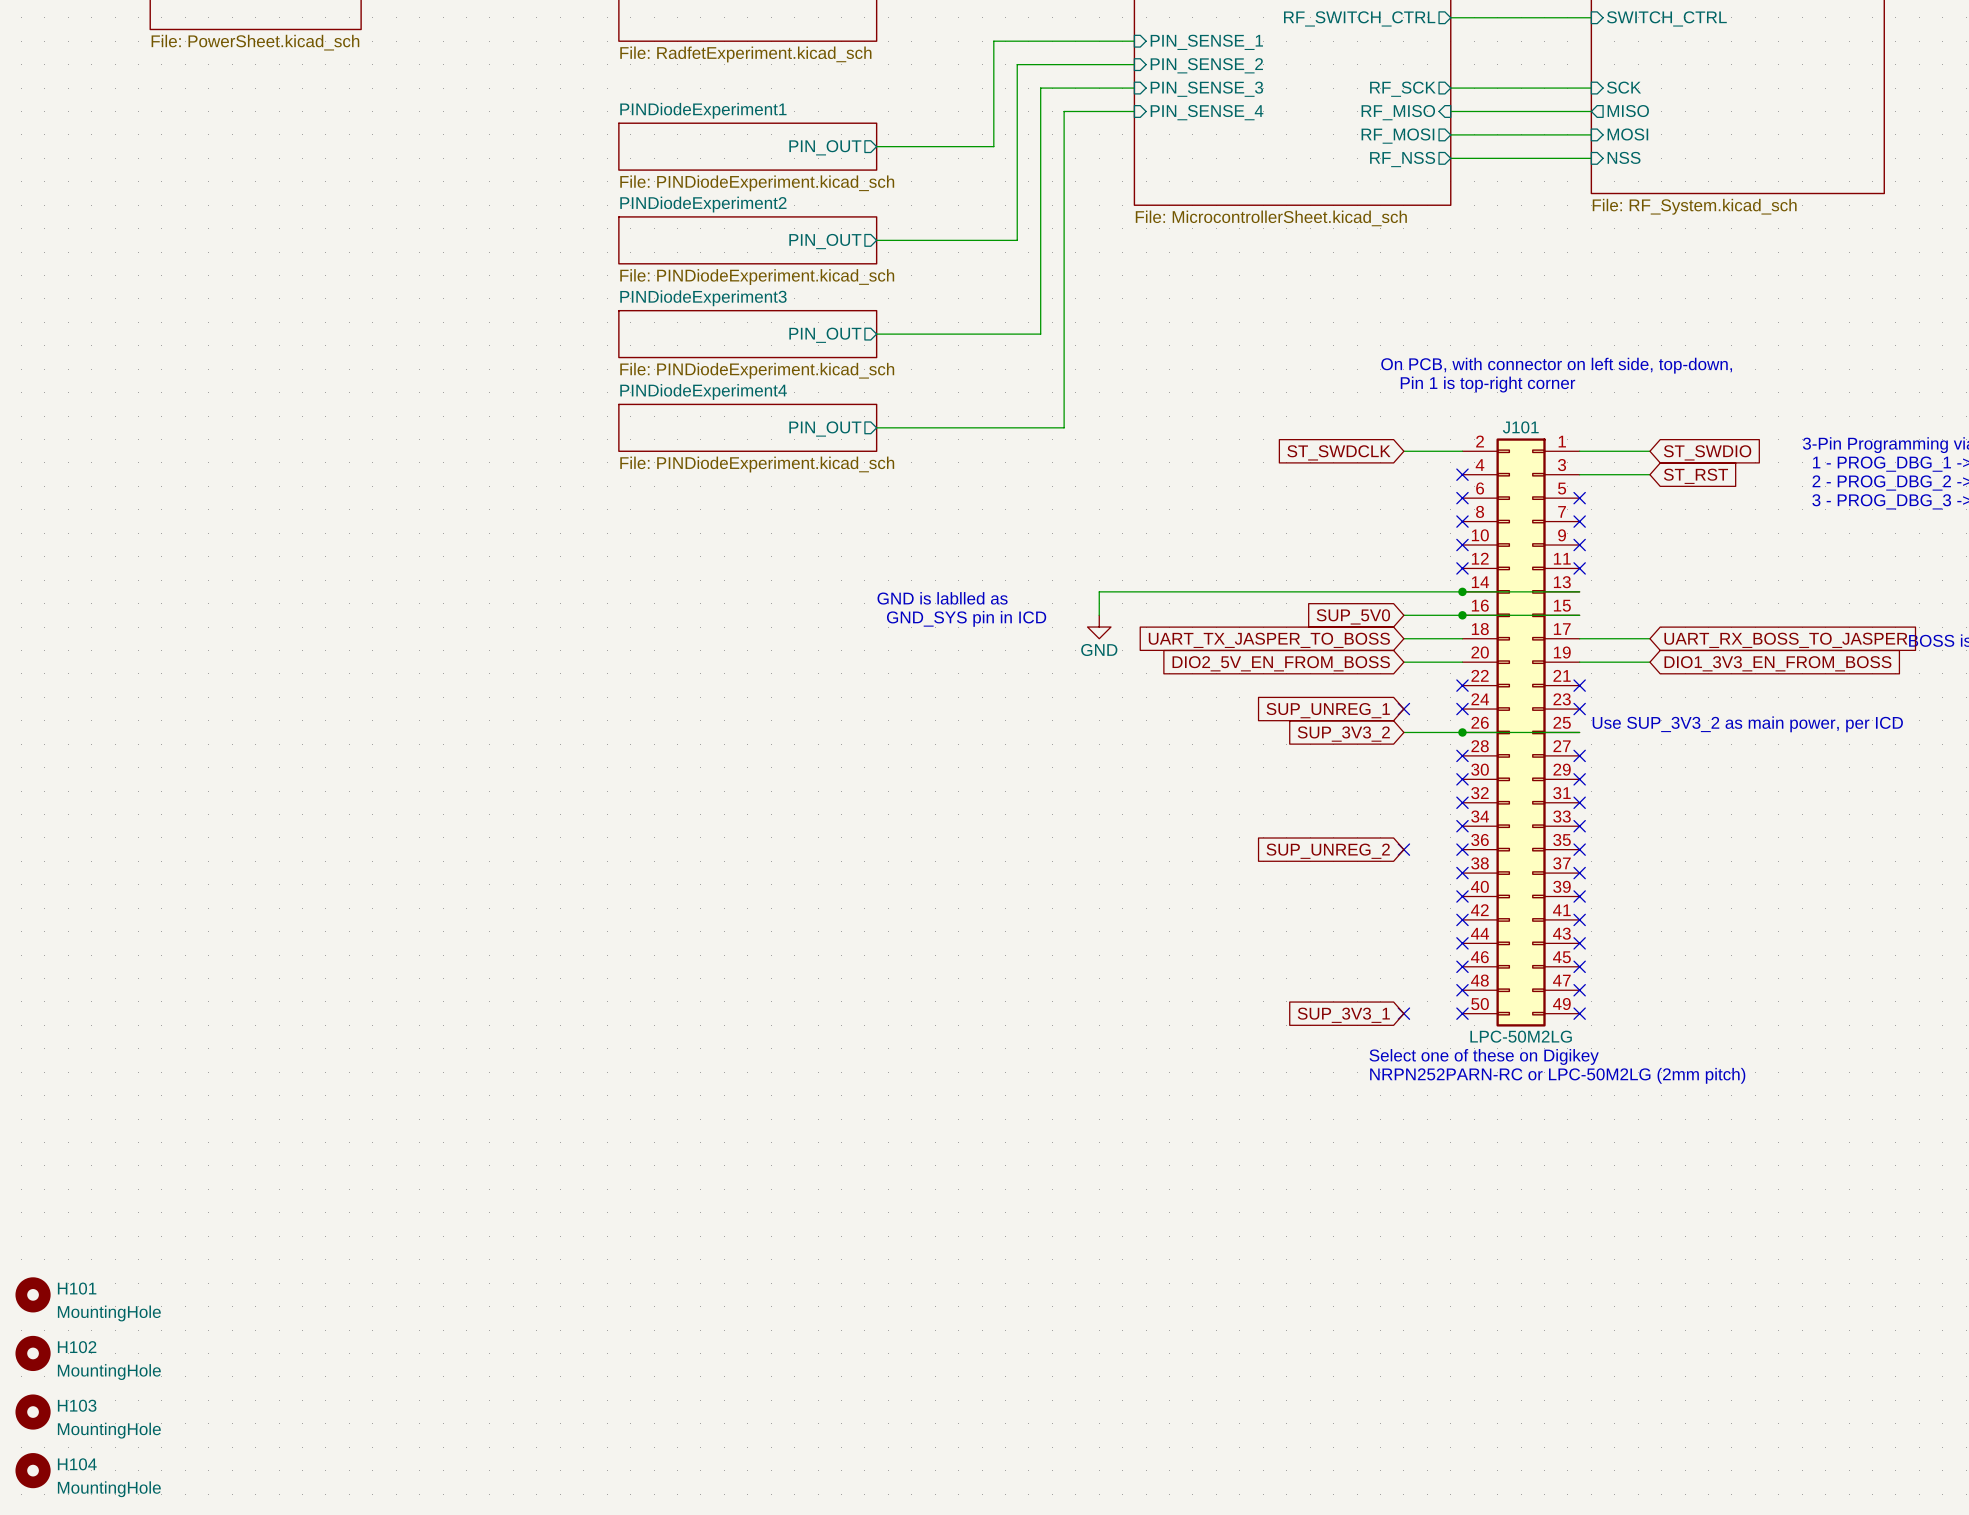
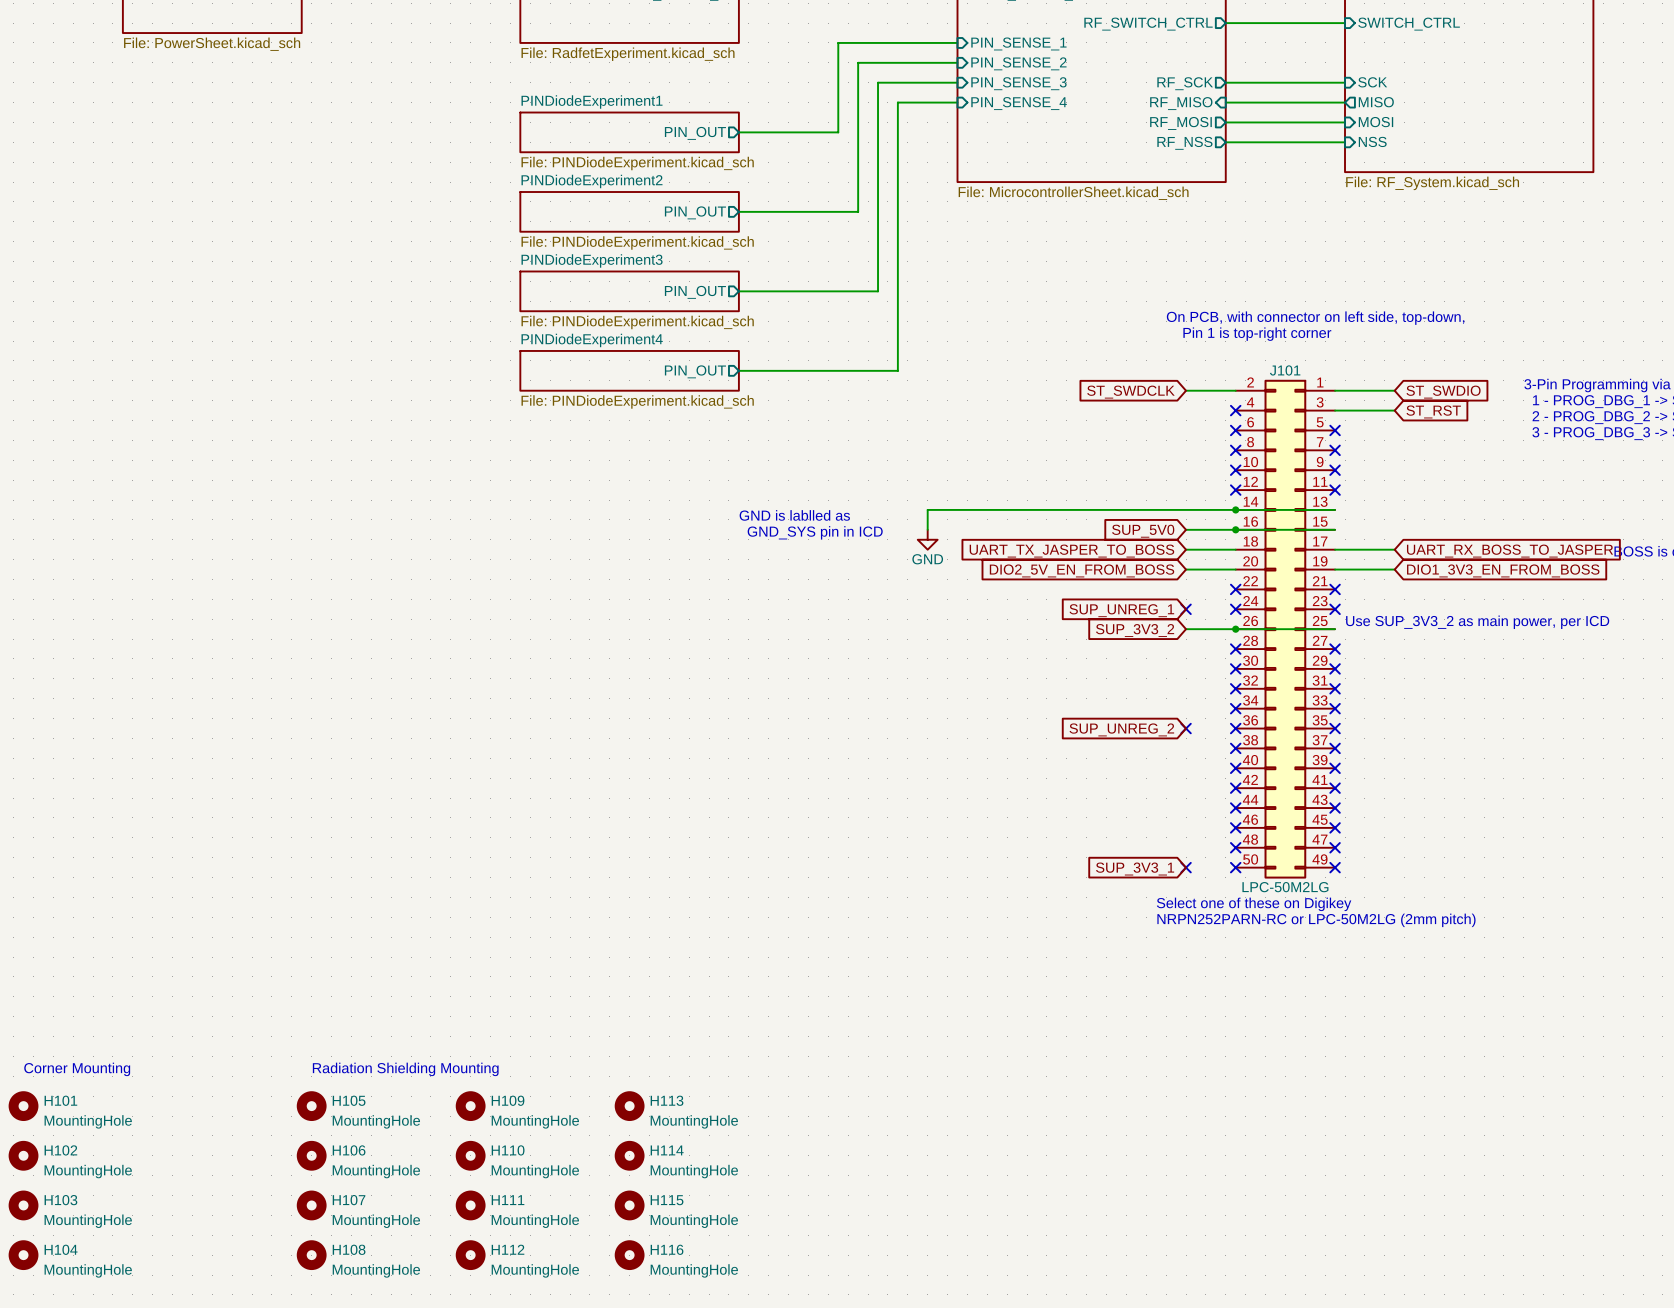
text: none -> Corner Mounting (77, 1069)
text: none -> Radiation Shielding Mounting (405, 1069)
H105: none -> MountingHole (311, 1106)
H109: none -> MountingHole (470, 1106)
H113: none -> MountingHole (629, 1106)
H106: none -> MountingHole (311, 1155)
H110: none -> MountingHole (470, 1155)
H114: none -> MountingHole (629, 1155)
H107: none -> MountingHole (311, 1205)
H111: none -> MountingHole (470, 1205)
H115: none -> MountingHole (629, 1205)
H108: none -> MountingHole (311, 1255)
H112: none -> MountingHole (470, 1255)
H116: none -> MountingHole (629, 1255)

